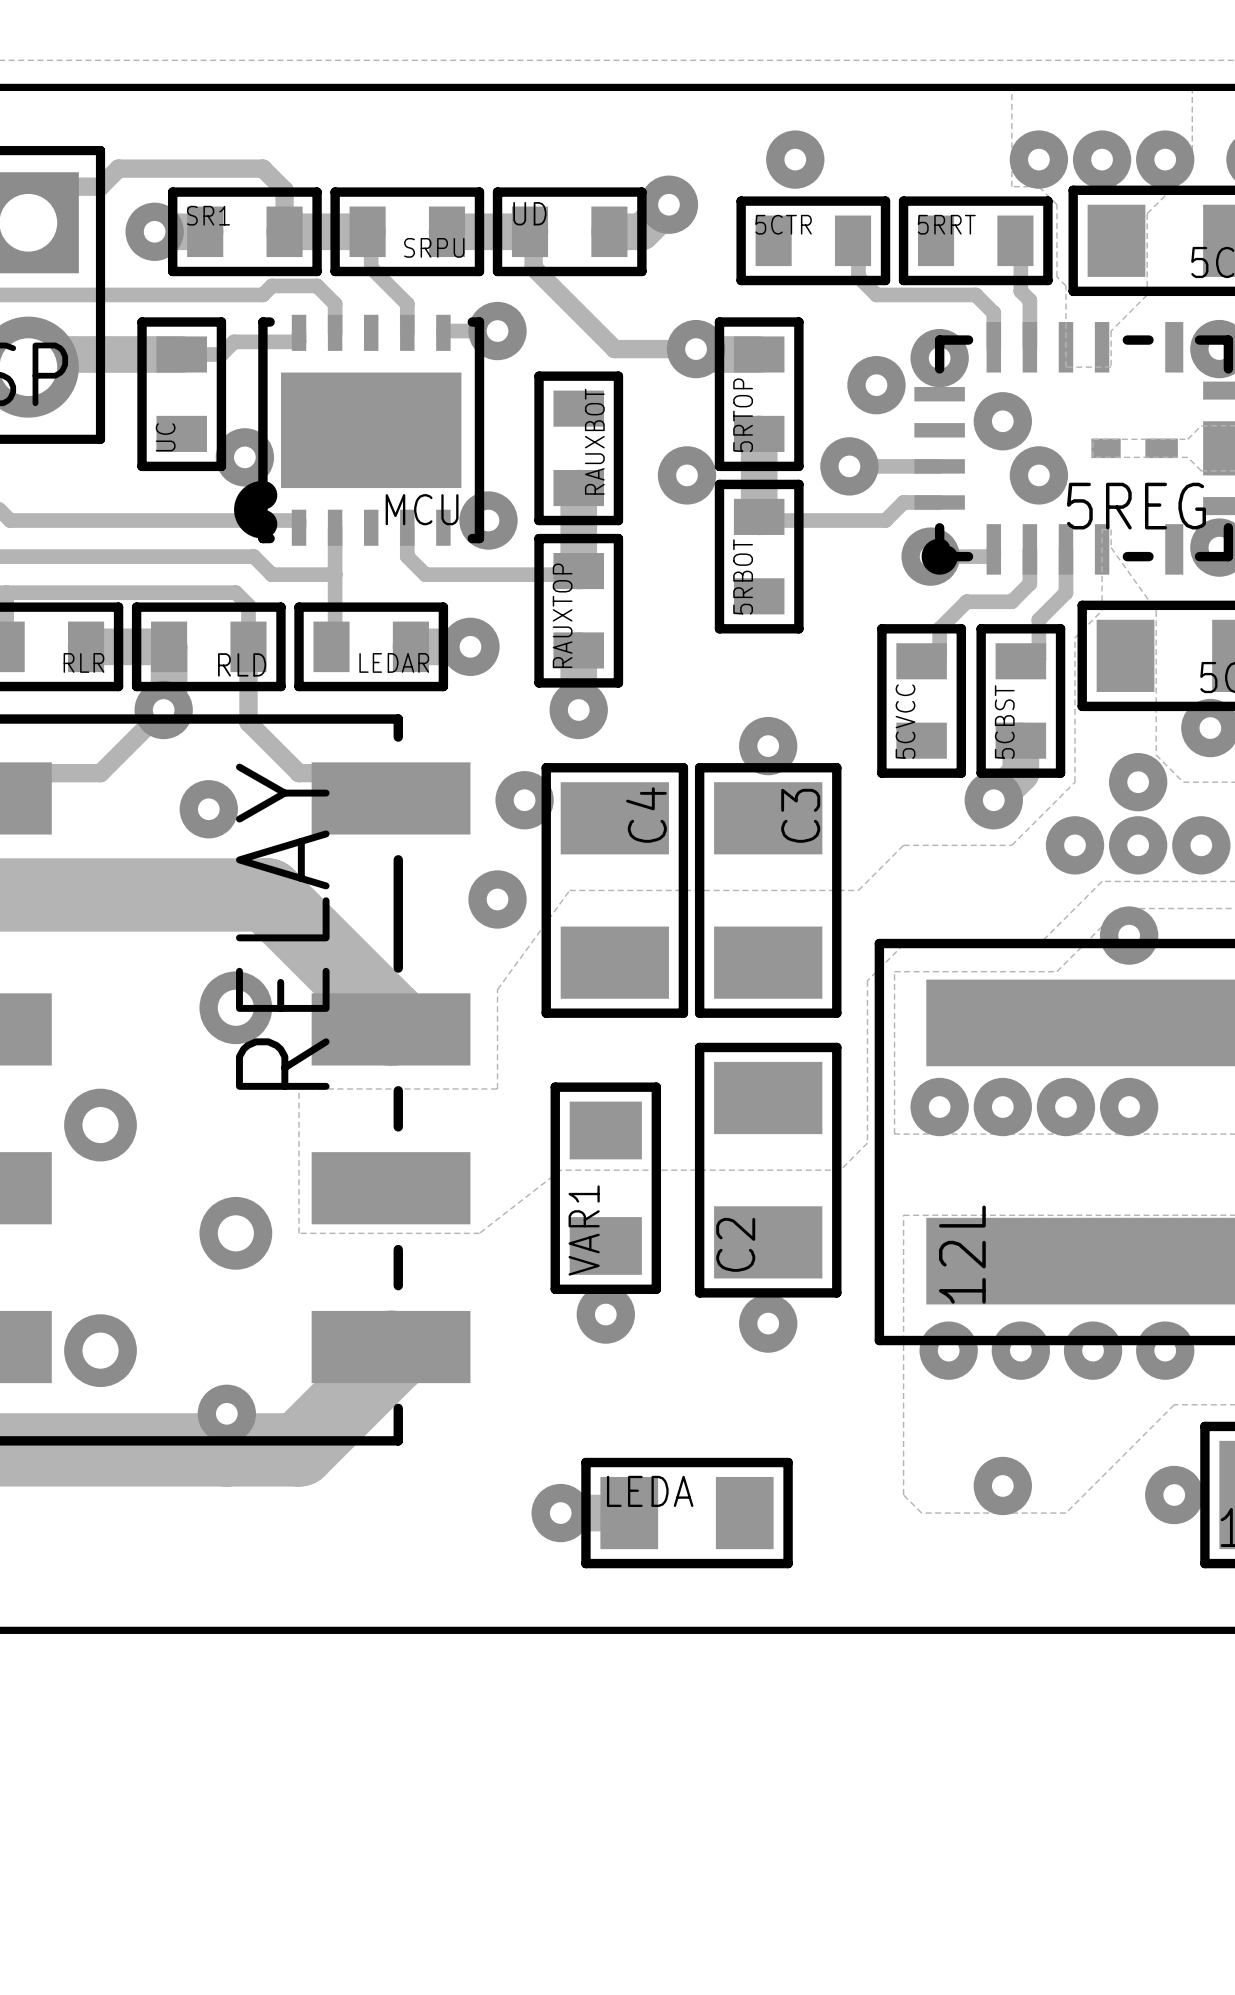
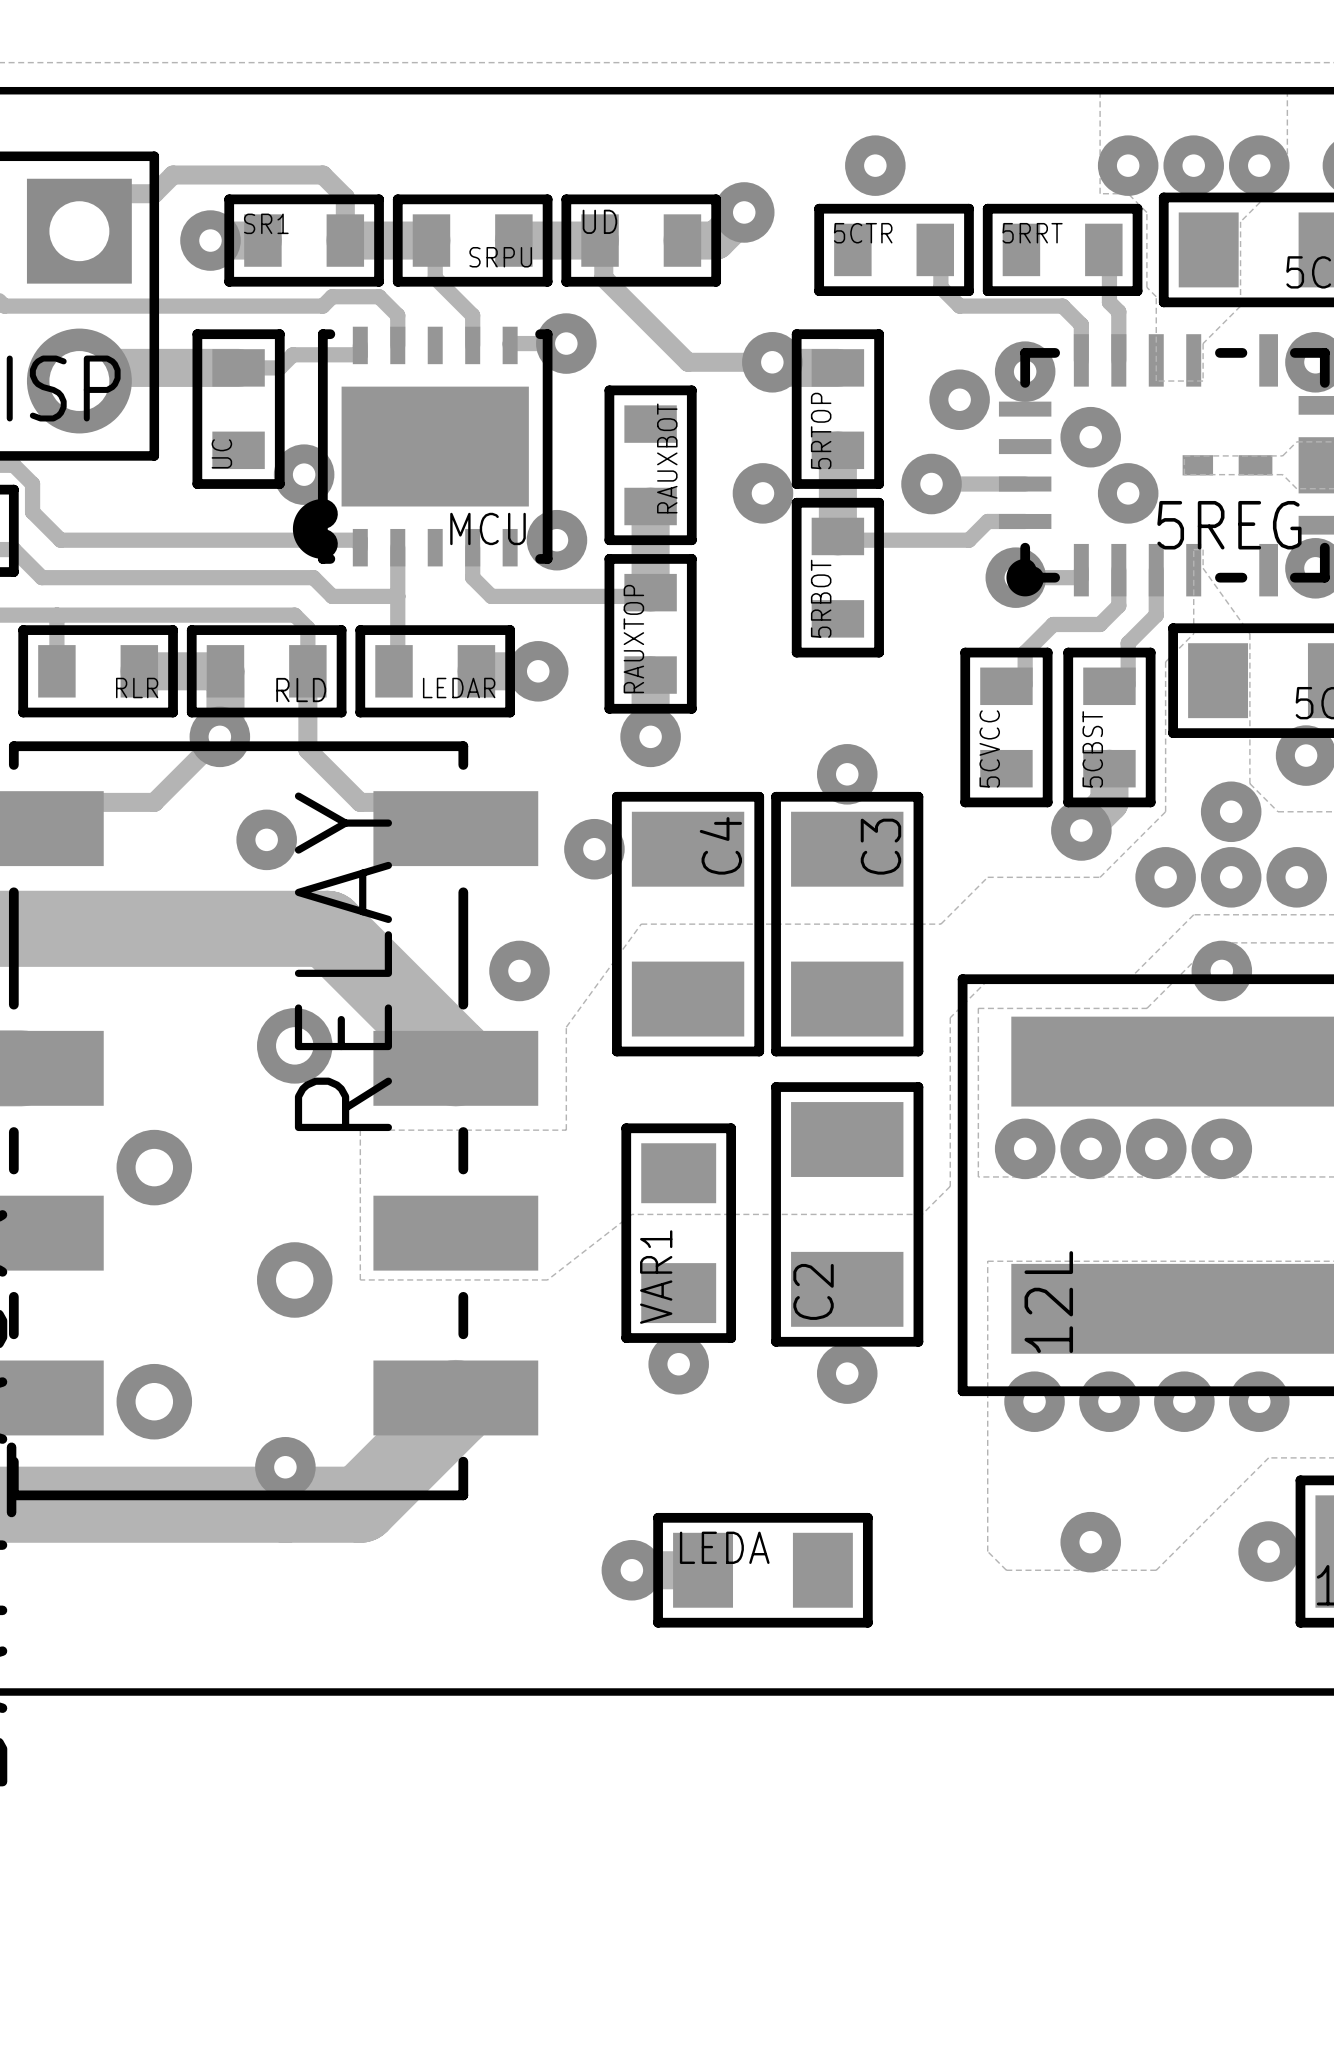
via position: (524, 800) -> (594, 849)
via position: (497, 899) -> (519, 970)

